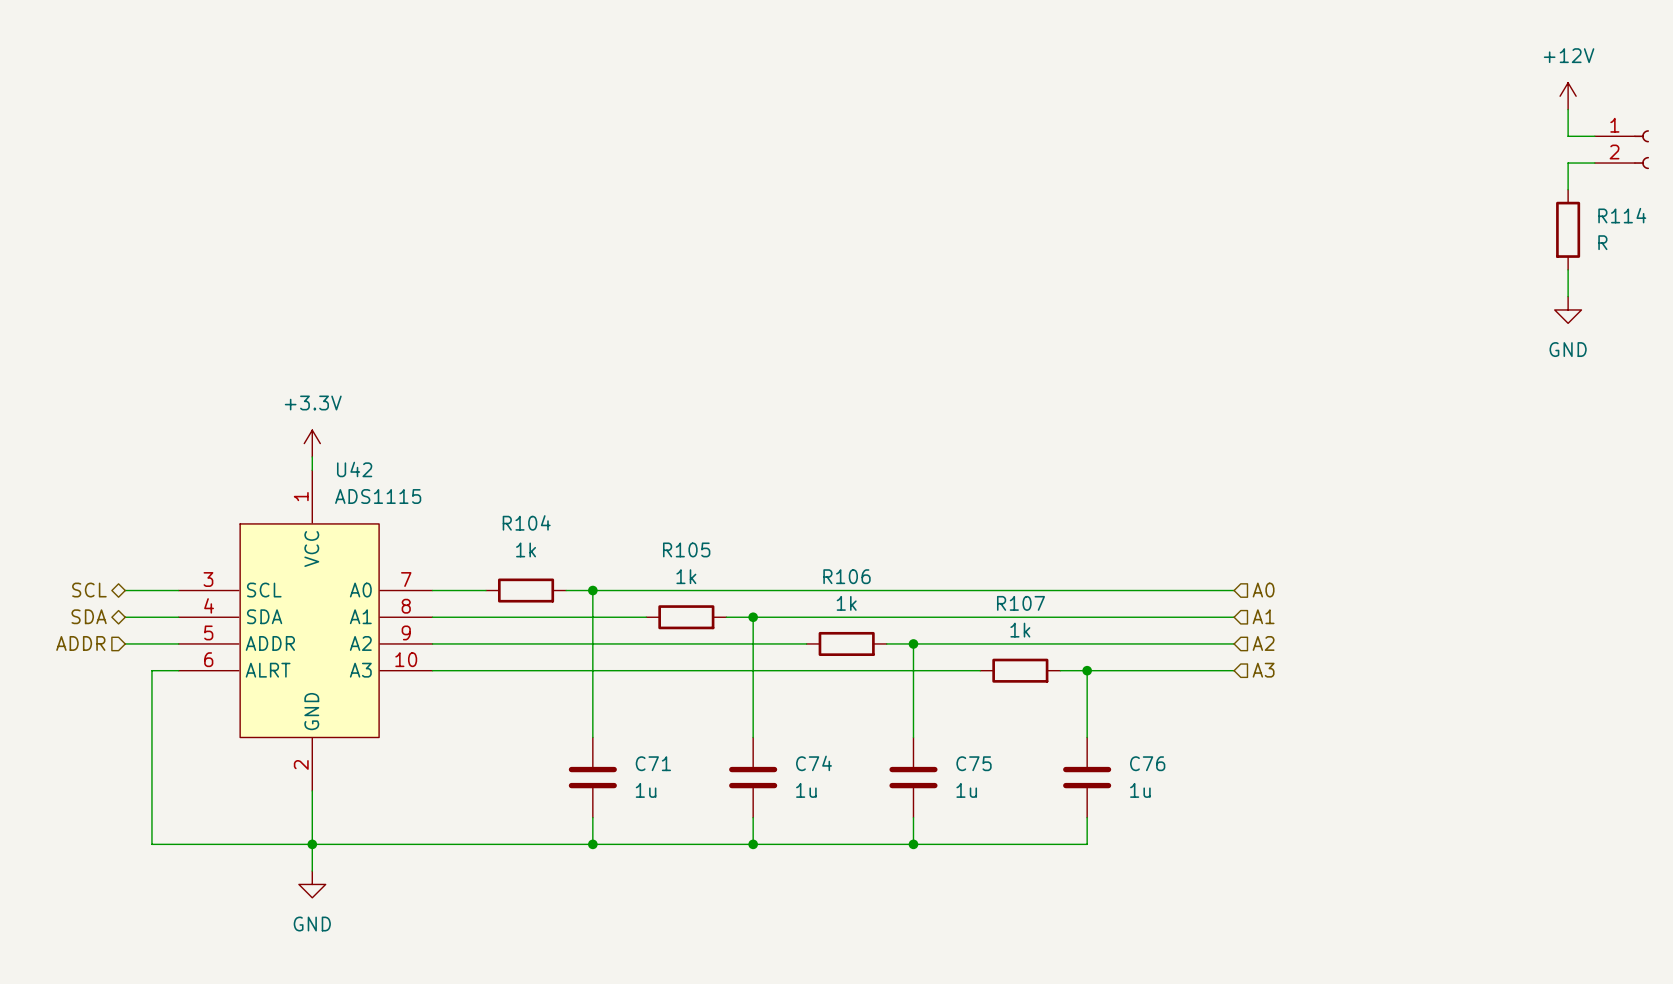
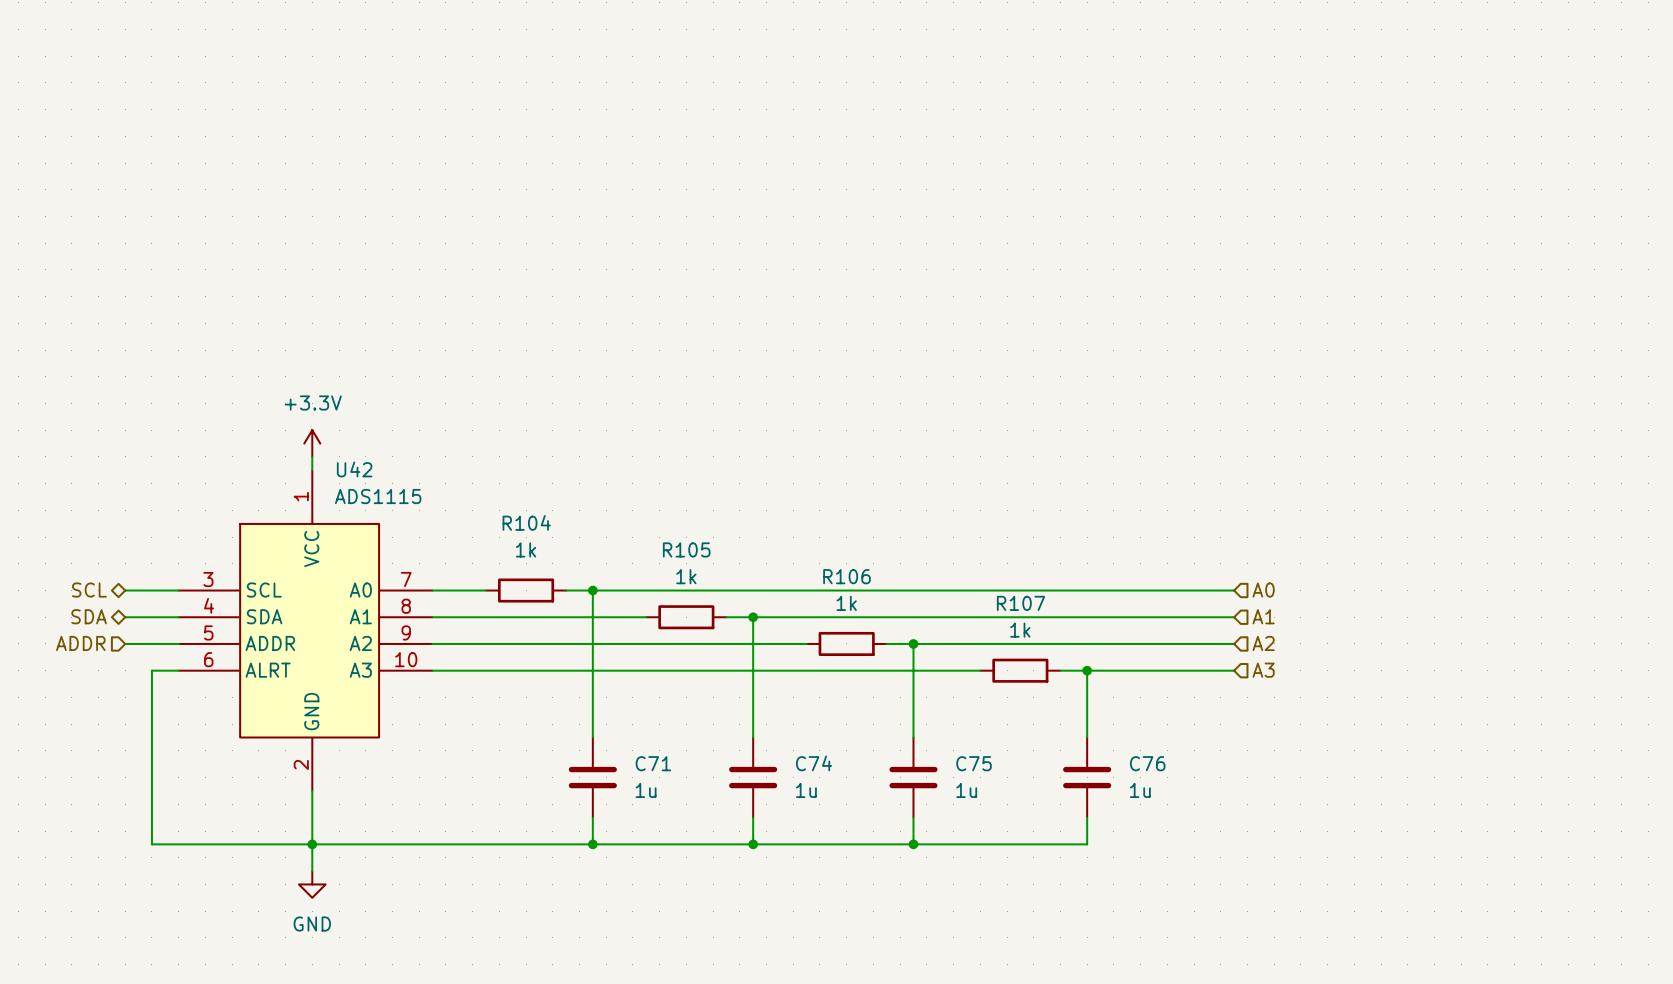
power symbol: +12V (1568, 96) -> none
wire: (1568, 109) (1568, 136) (1594, 136) -> none
part: (1621, 149) -> none
wire: (1594, 163) (1568, 163) (1568, 189) -> none
R114: R (1568, 229) -> none
wire: (1568, 269) (1568, 296) -> none
power symbol: GND (1568, 309) -> none

